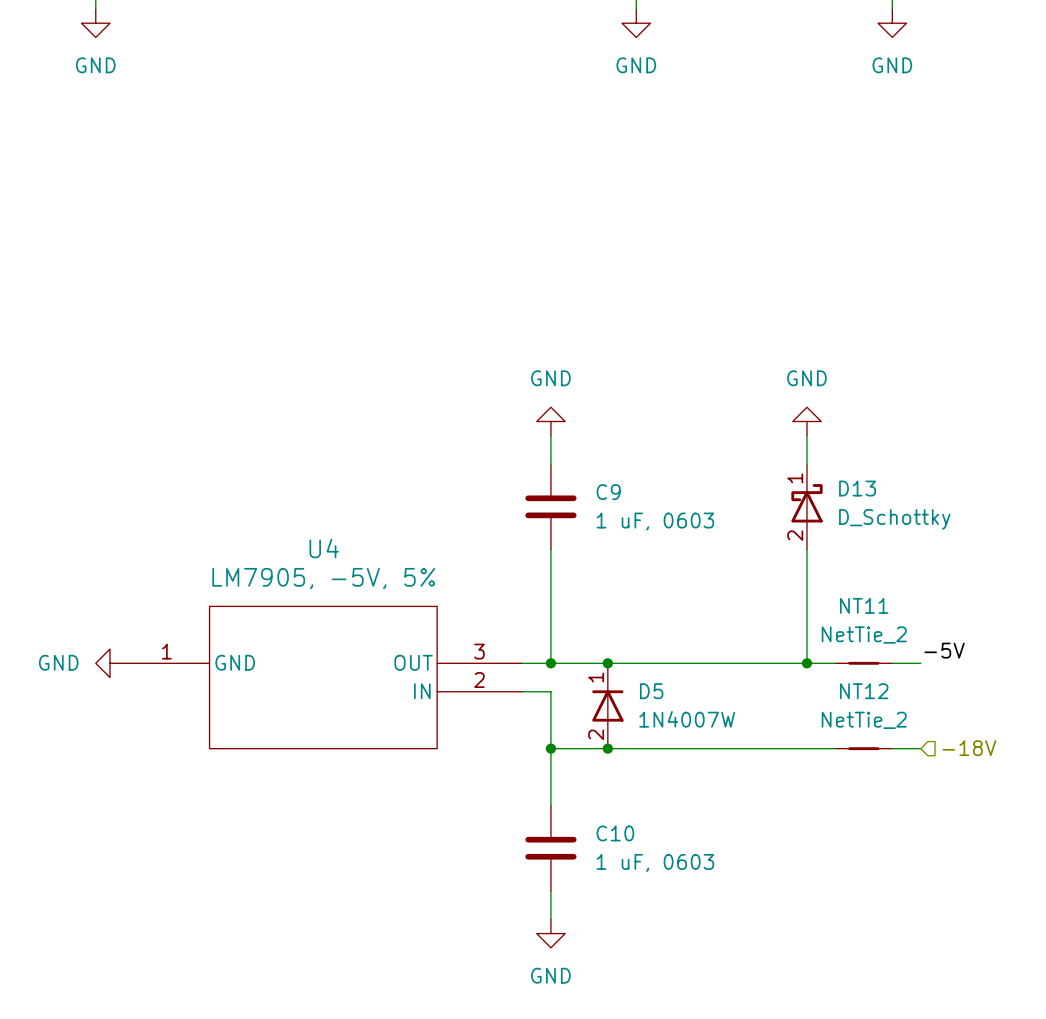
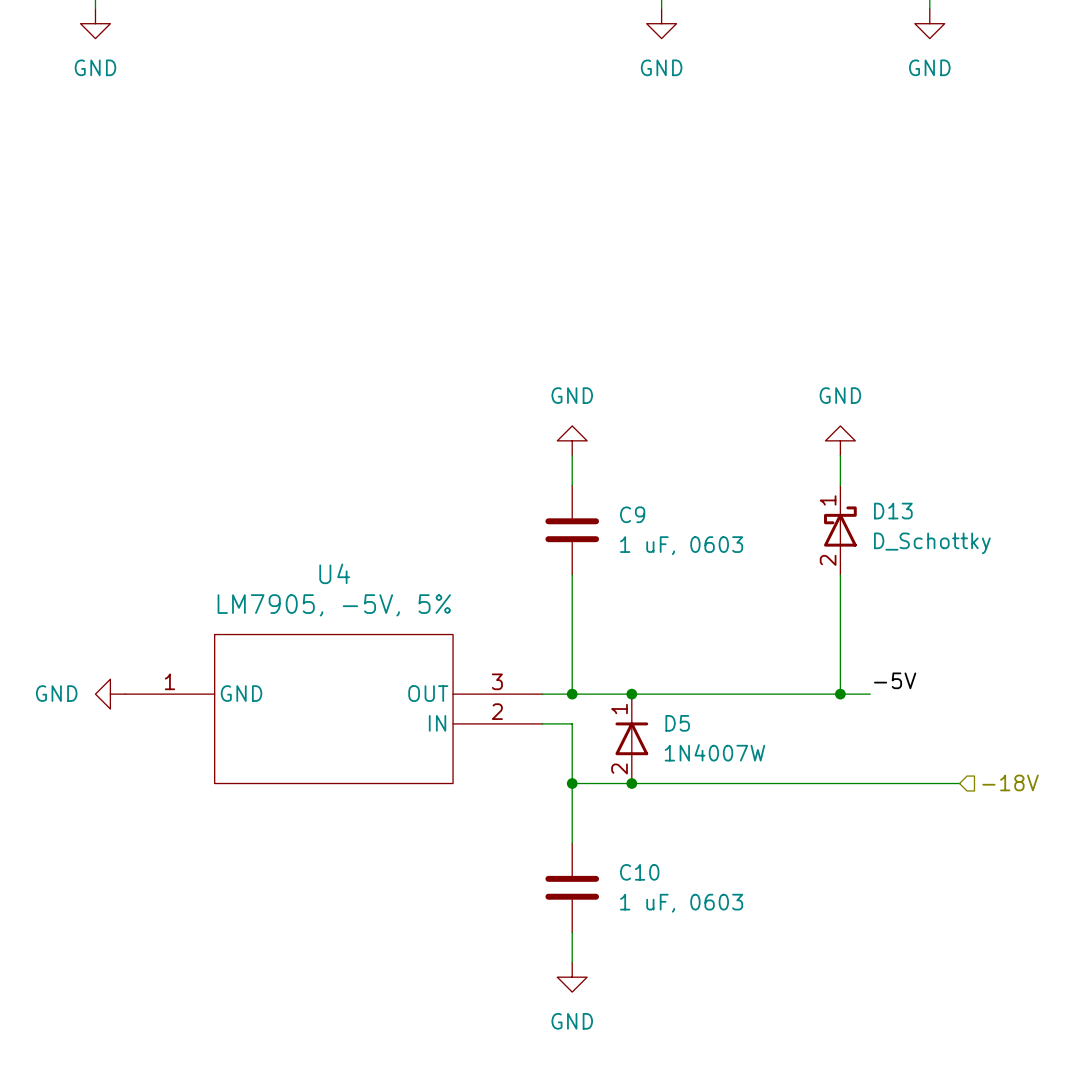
label position: -5V (944, 650) -> -5V (895, 680)
NT11: NetTie_2 (863, 663) -> none
wire: (892, 663) (920, 663) -> none
NT12: NetTie_2 (863, 748) -> none

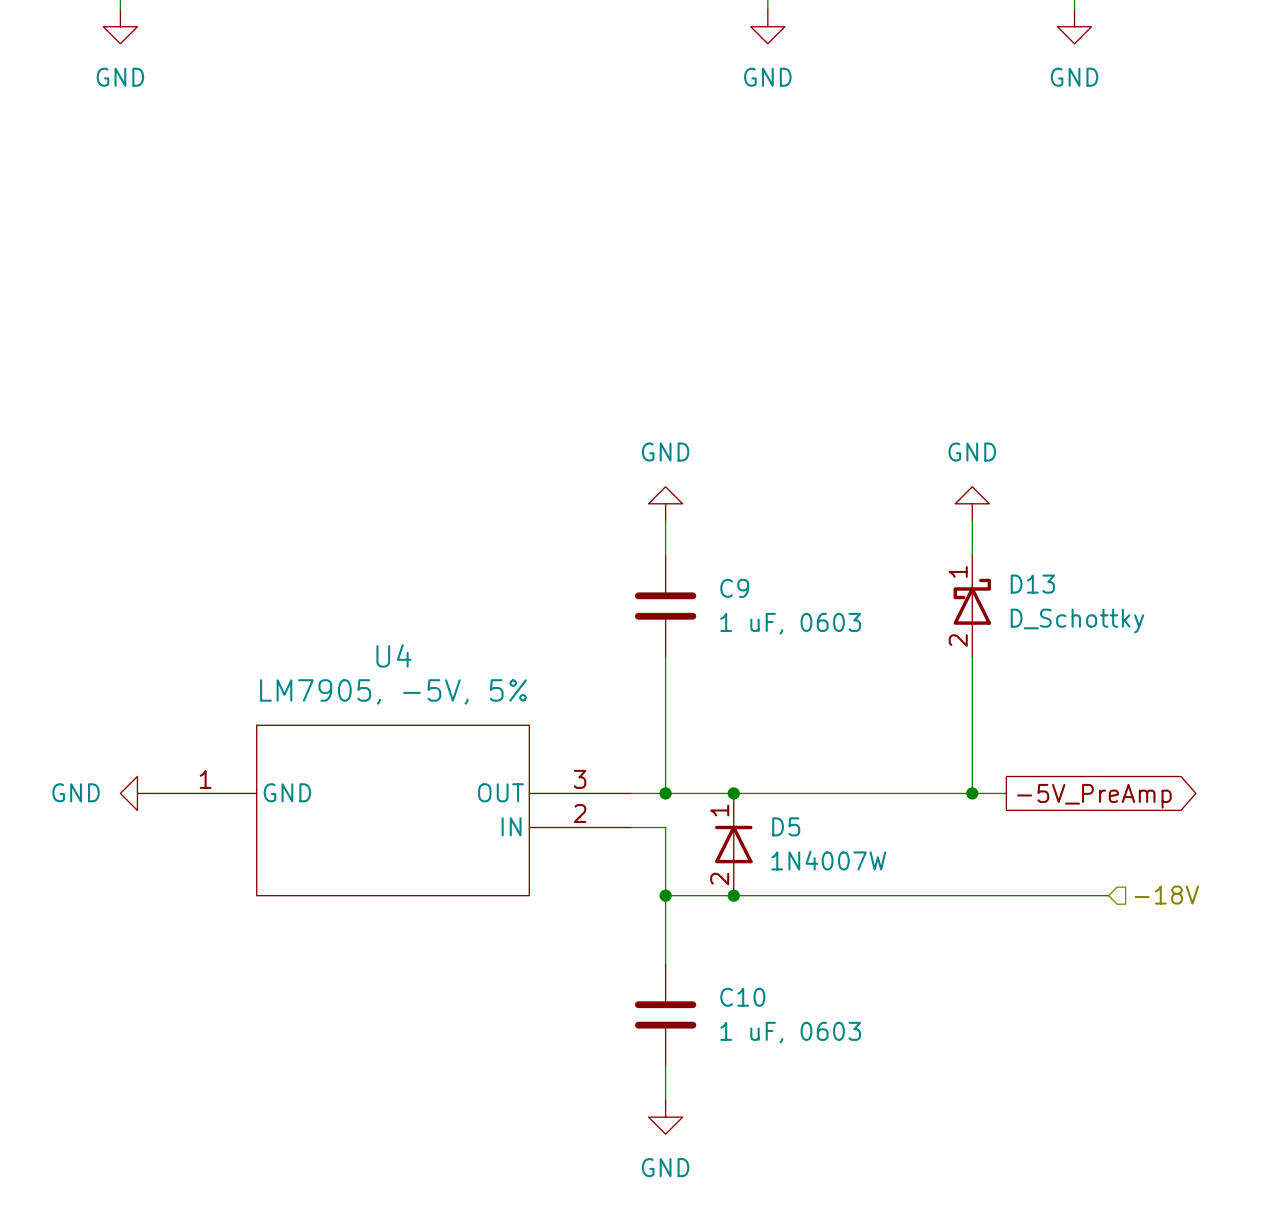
label: -5V (895, 680) -> none
global label: none -> -5V_PreAmp (1094, 796)

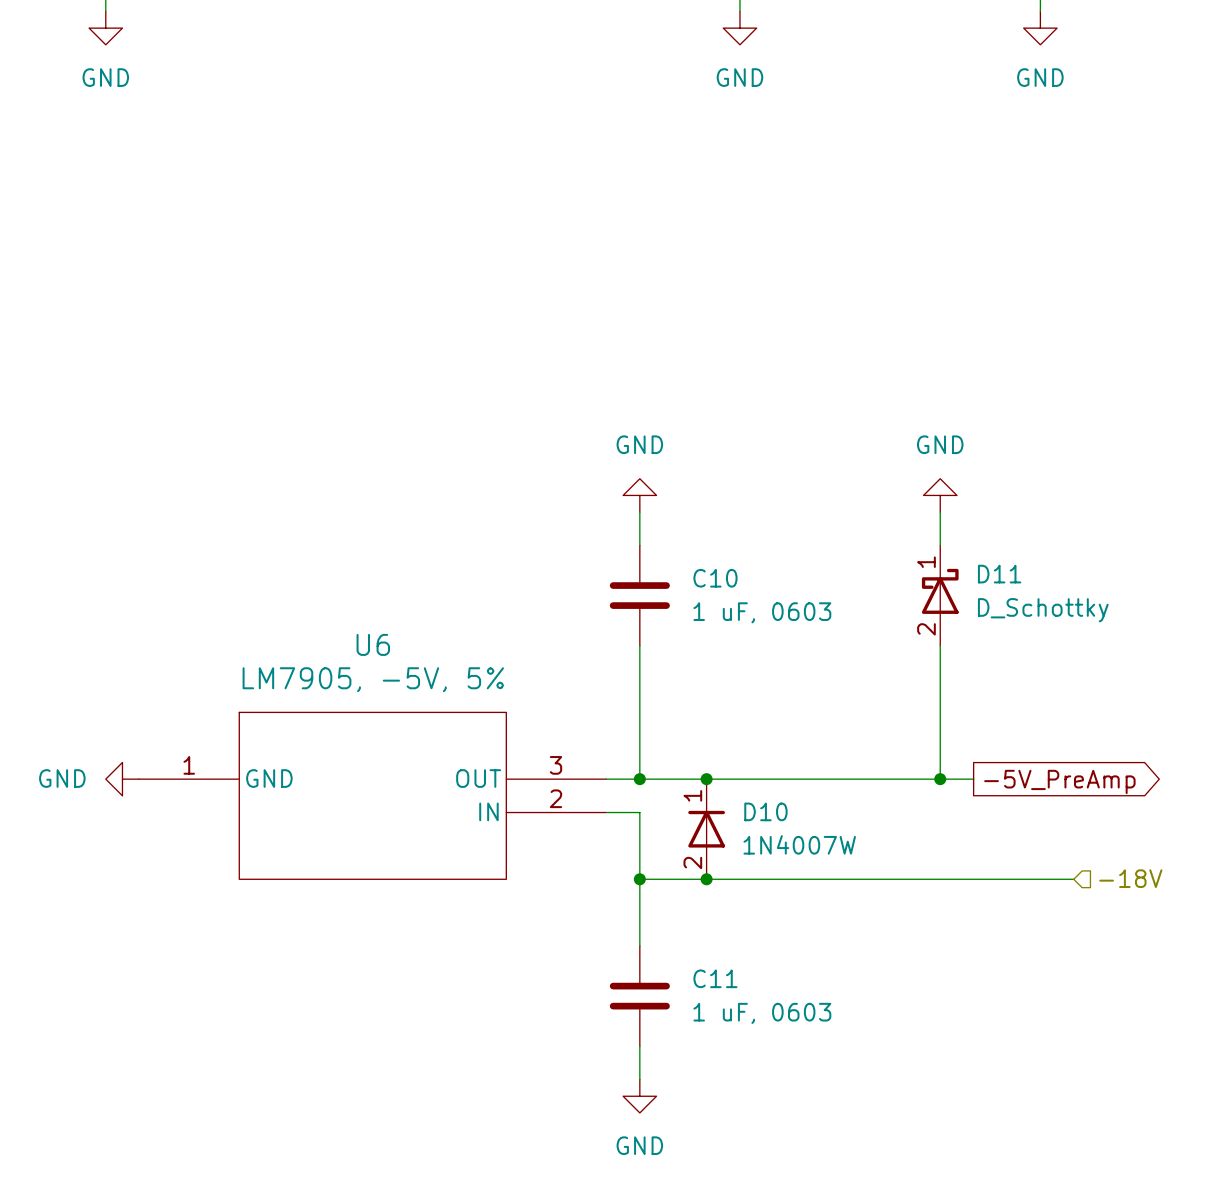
D13 name: D13 (1032, 584) -> D11 (999, 574)
C9 name: C9 (734, 588) -> C10 (715, 578)
U4 name: U4 (393, 655) -> U6 (373, 644)
D5 name: D5 (786, 826) -> D10 (765, 811)
C10 name: C10 (742, 997) -> C11 (715, 978)

